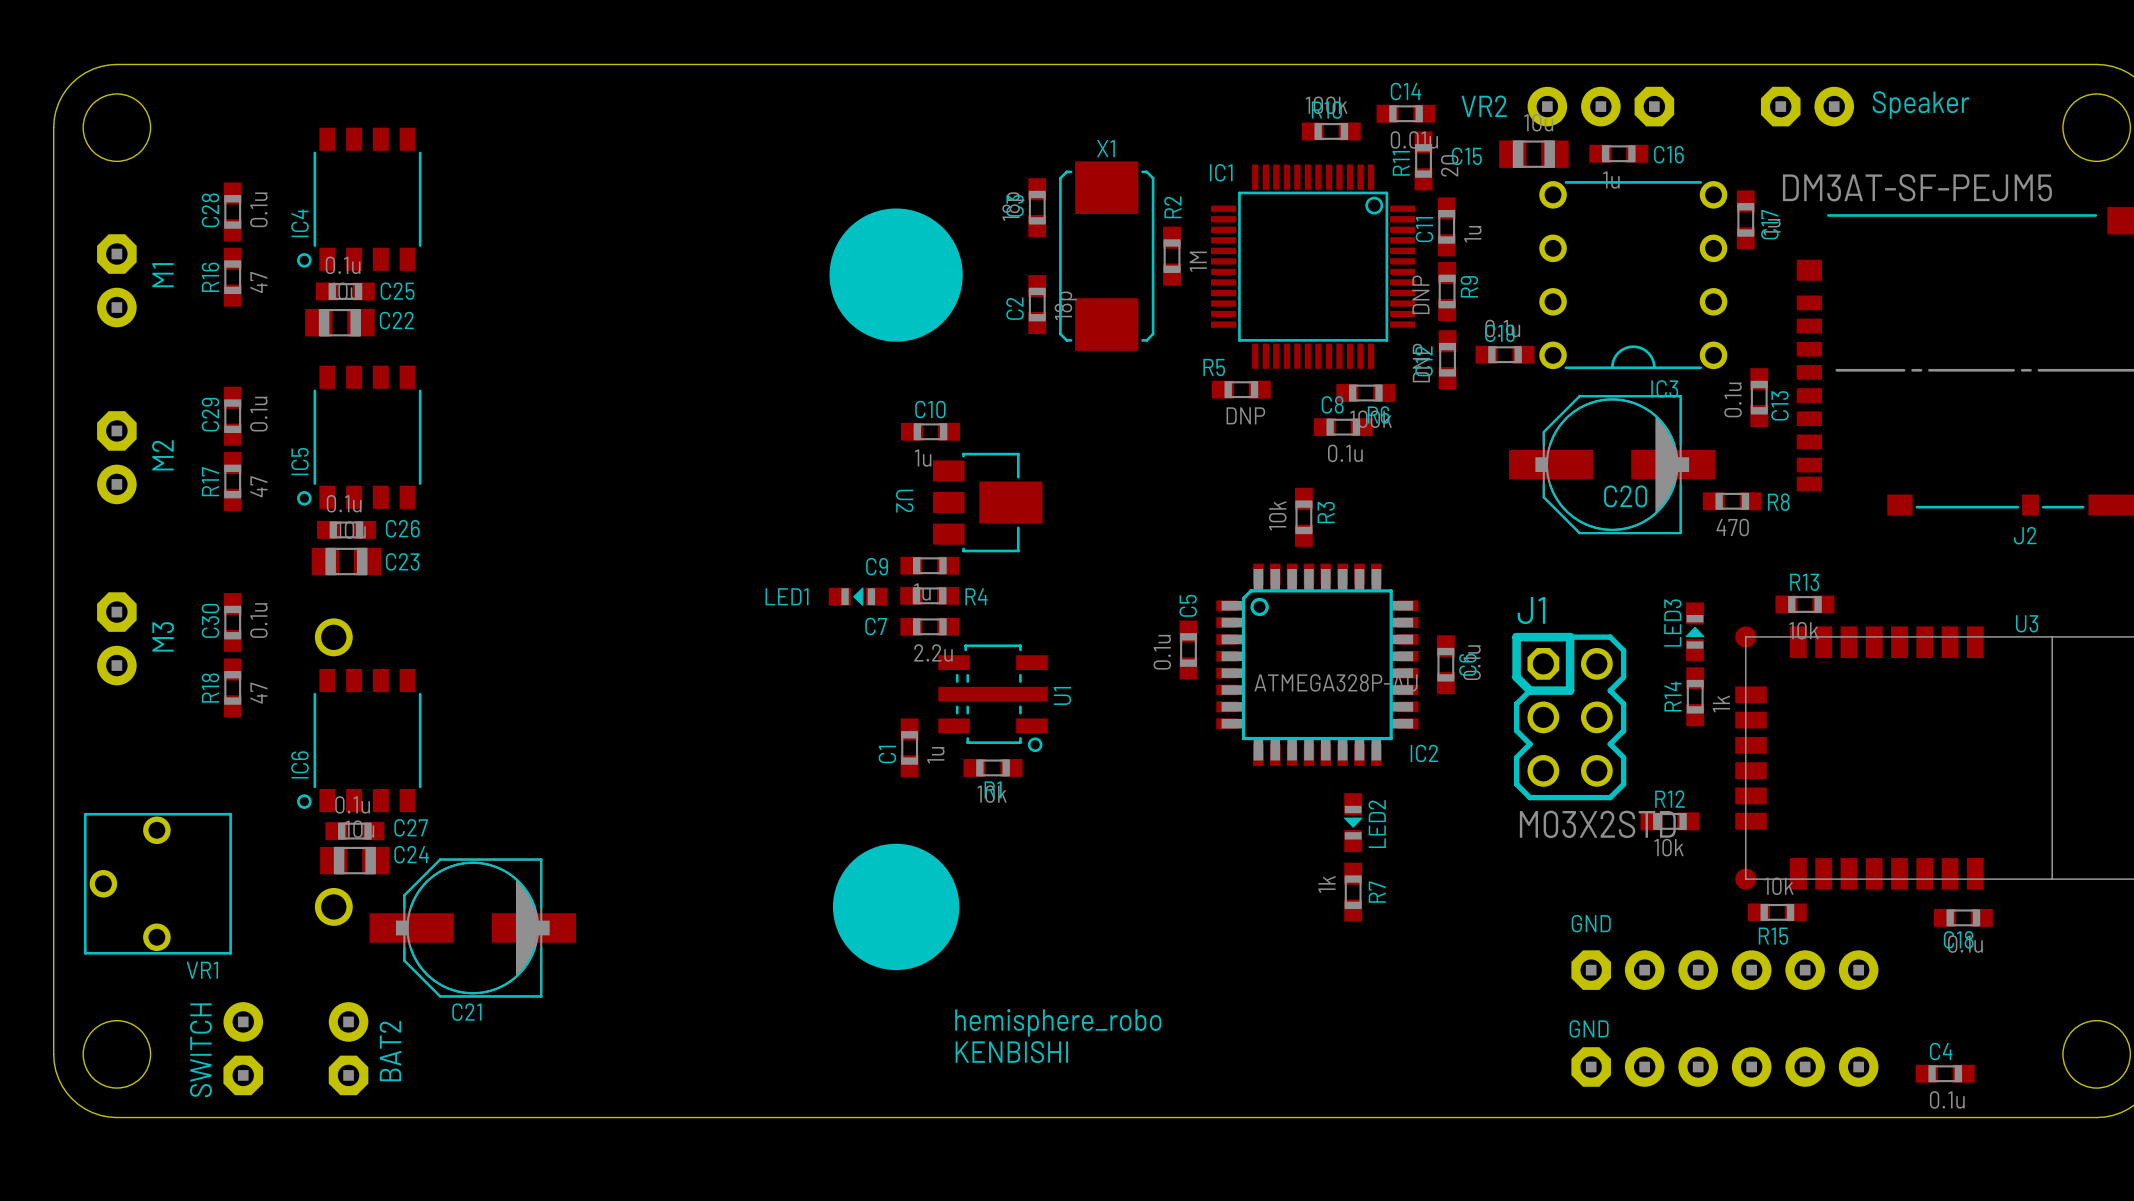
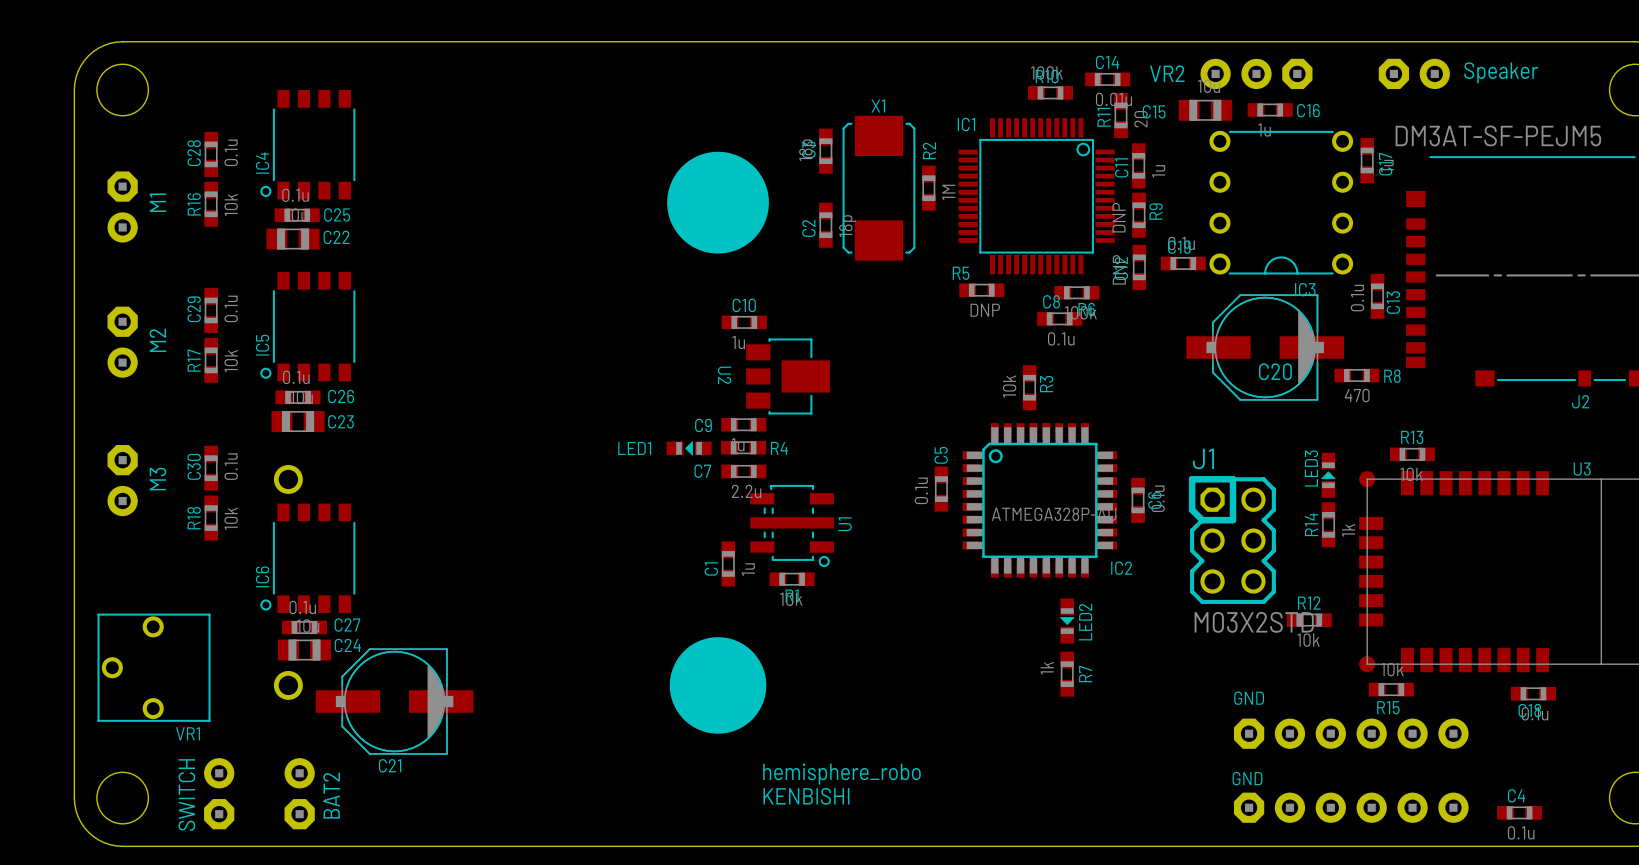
R16 value: 47 (258, 282) -> 10k (231, 205)
R17 value: 47 (258, 486) -> 10k (231, 361)
R18 value: 47 (258, 693) -> 10k (231, 518)

